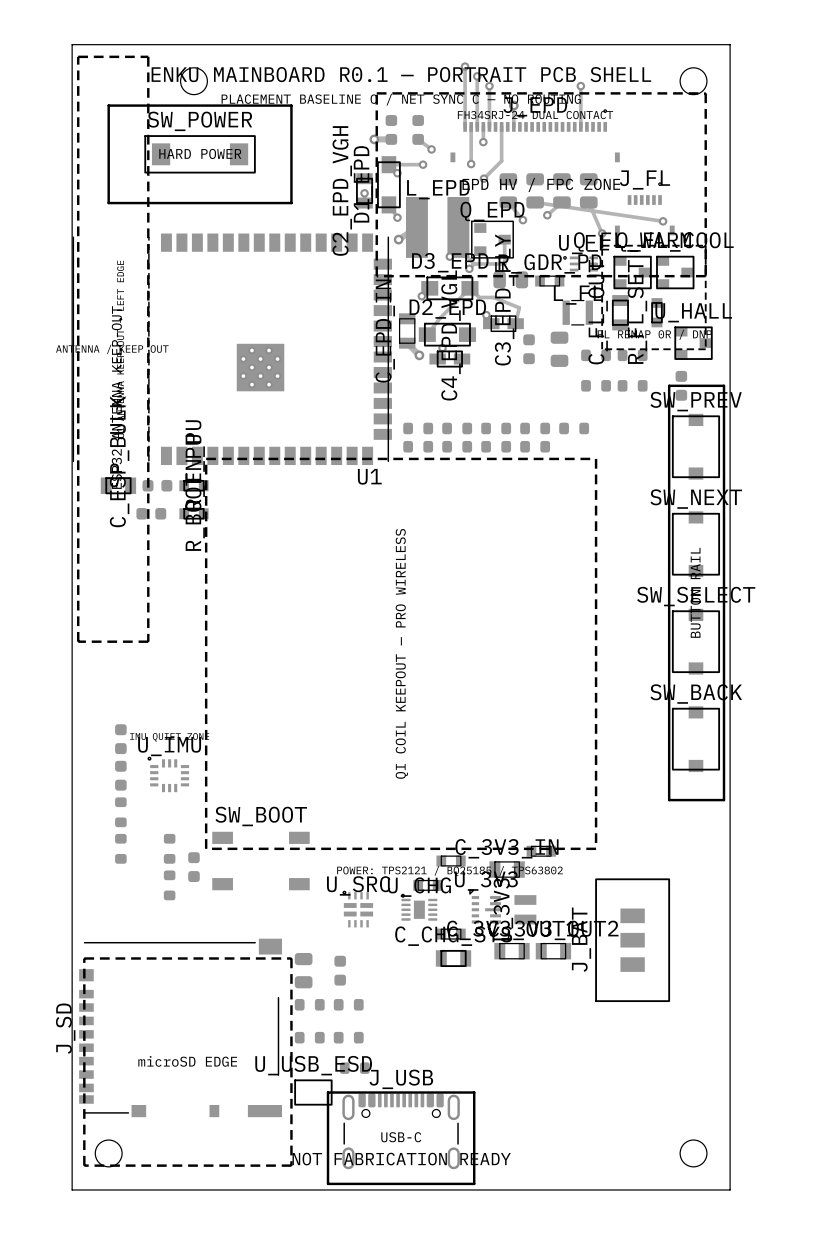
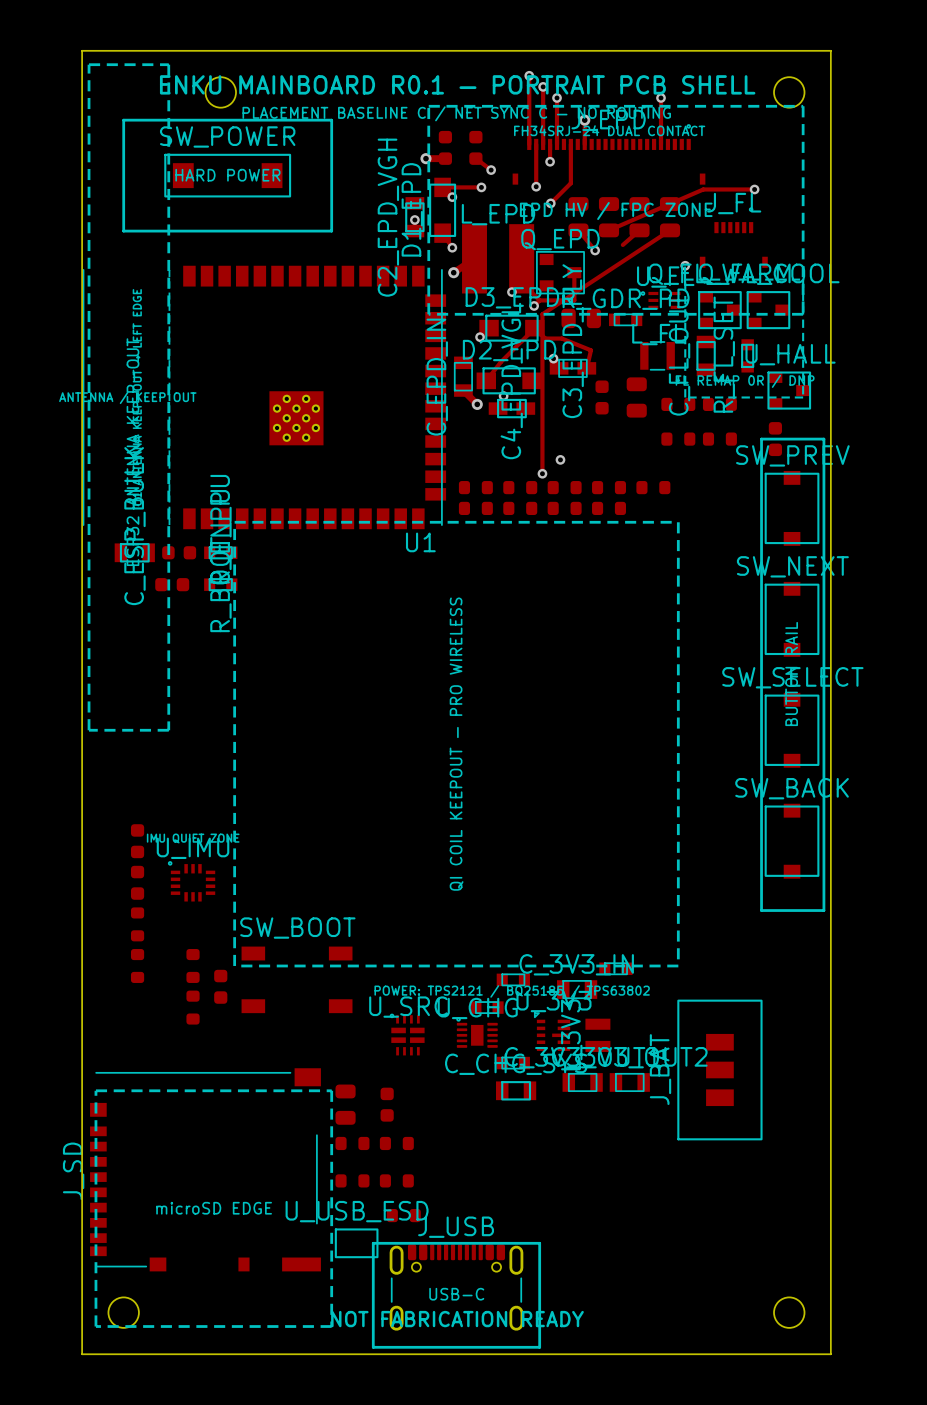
track: (535, 202) (663, 221) -> (609, 230) (703, 189) (754, 189)
track: (588, 202) (602, 233) -> (670, 230) (542, 314) (542, 473)
via: (547, 215) -> none
via position: (663, 221) -> (754, 189)
via: none -> (560, 459)
via: none -> (542, 473)

